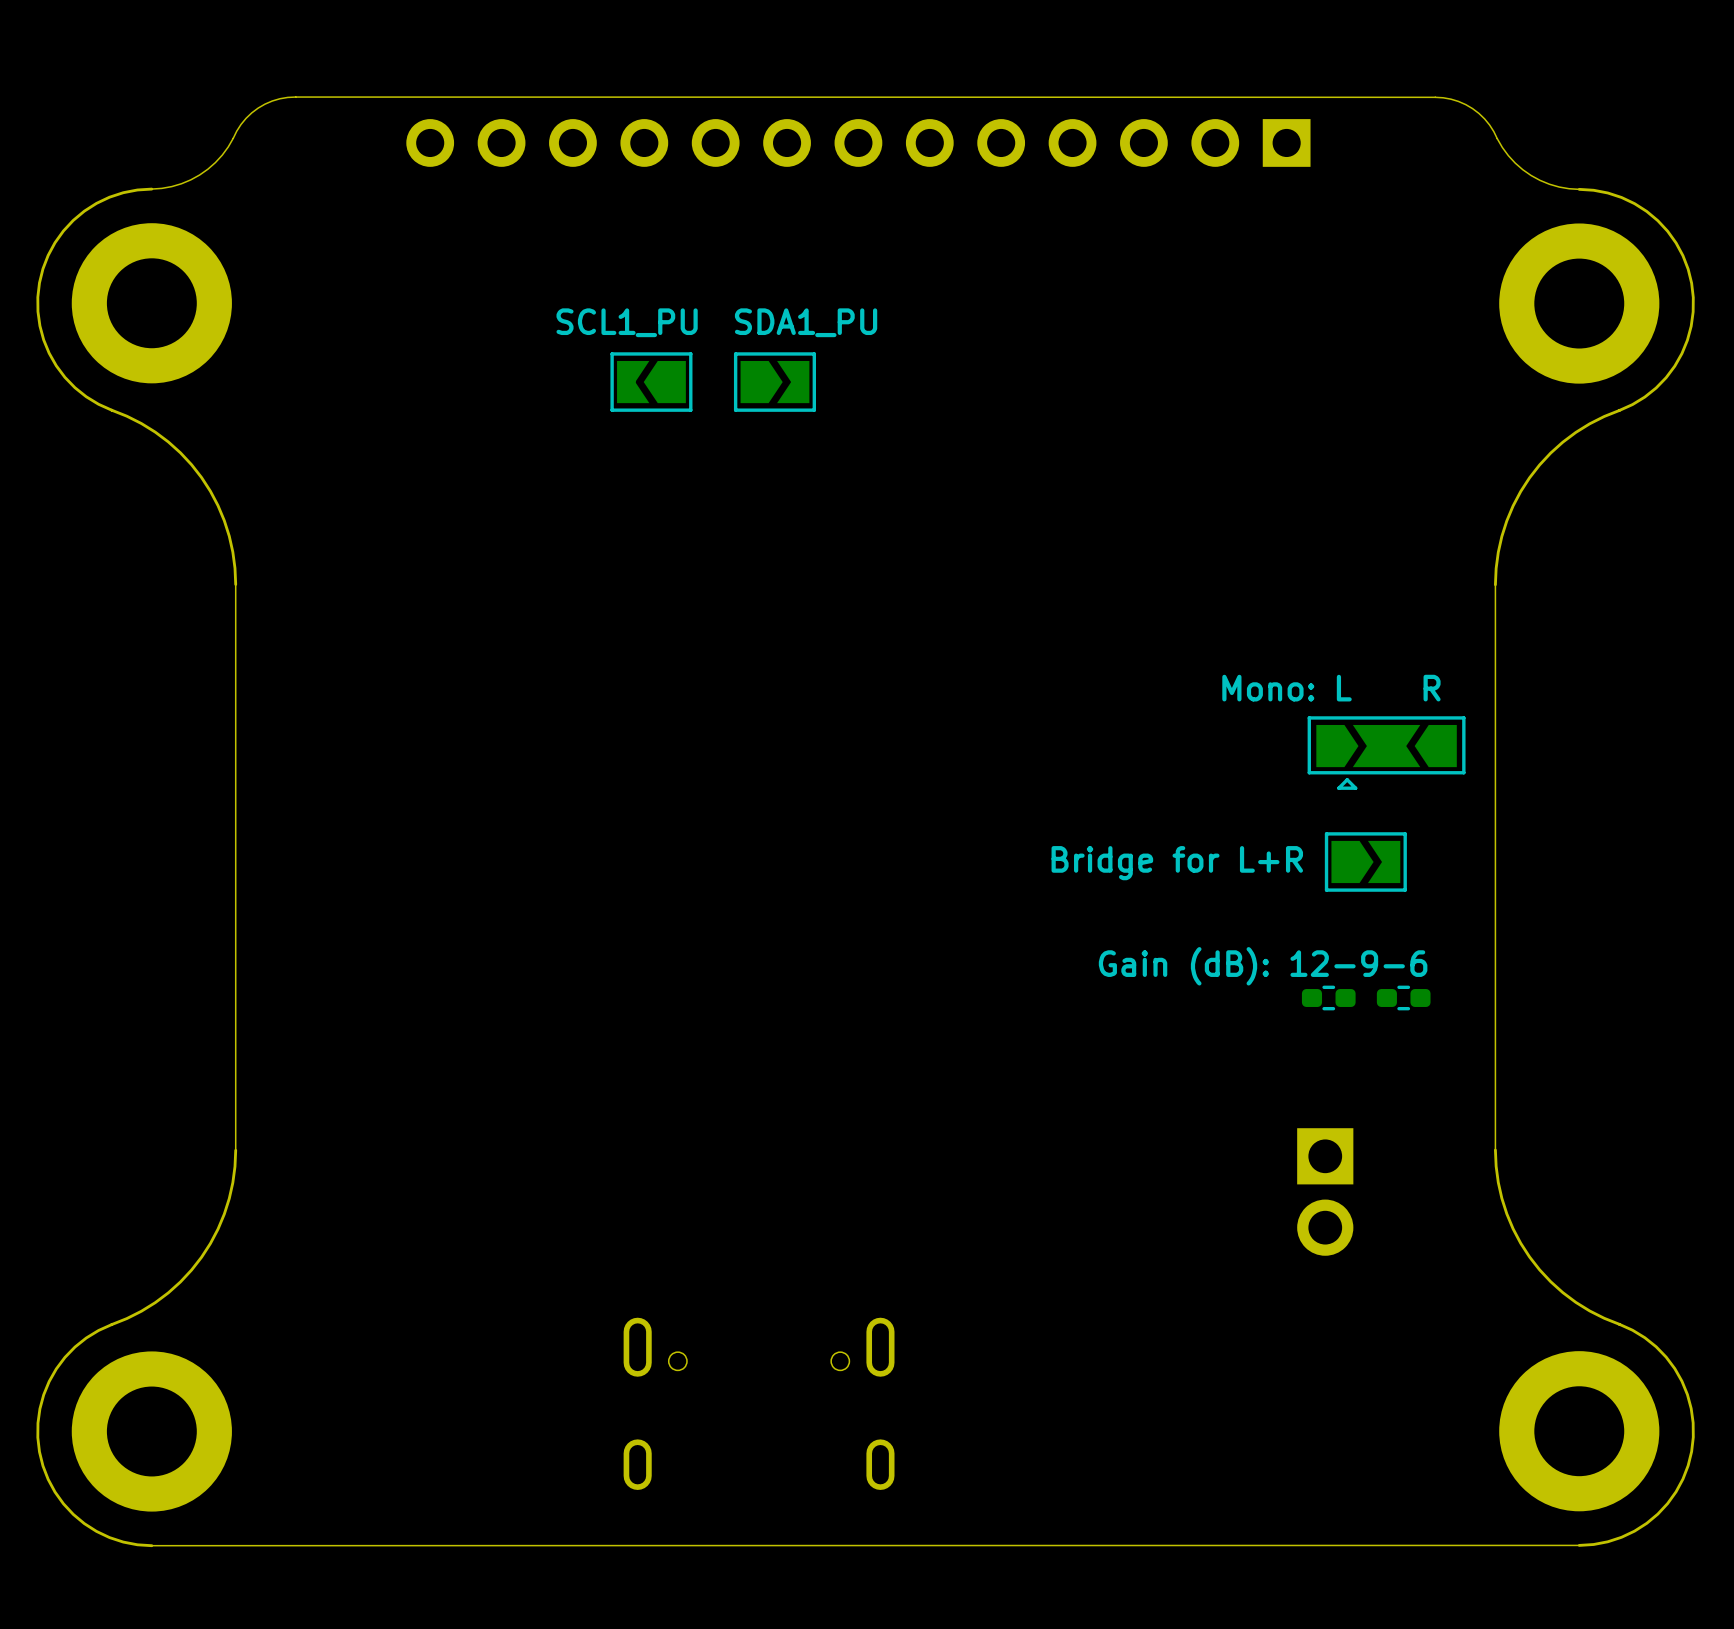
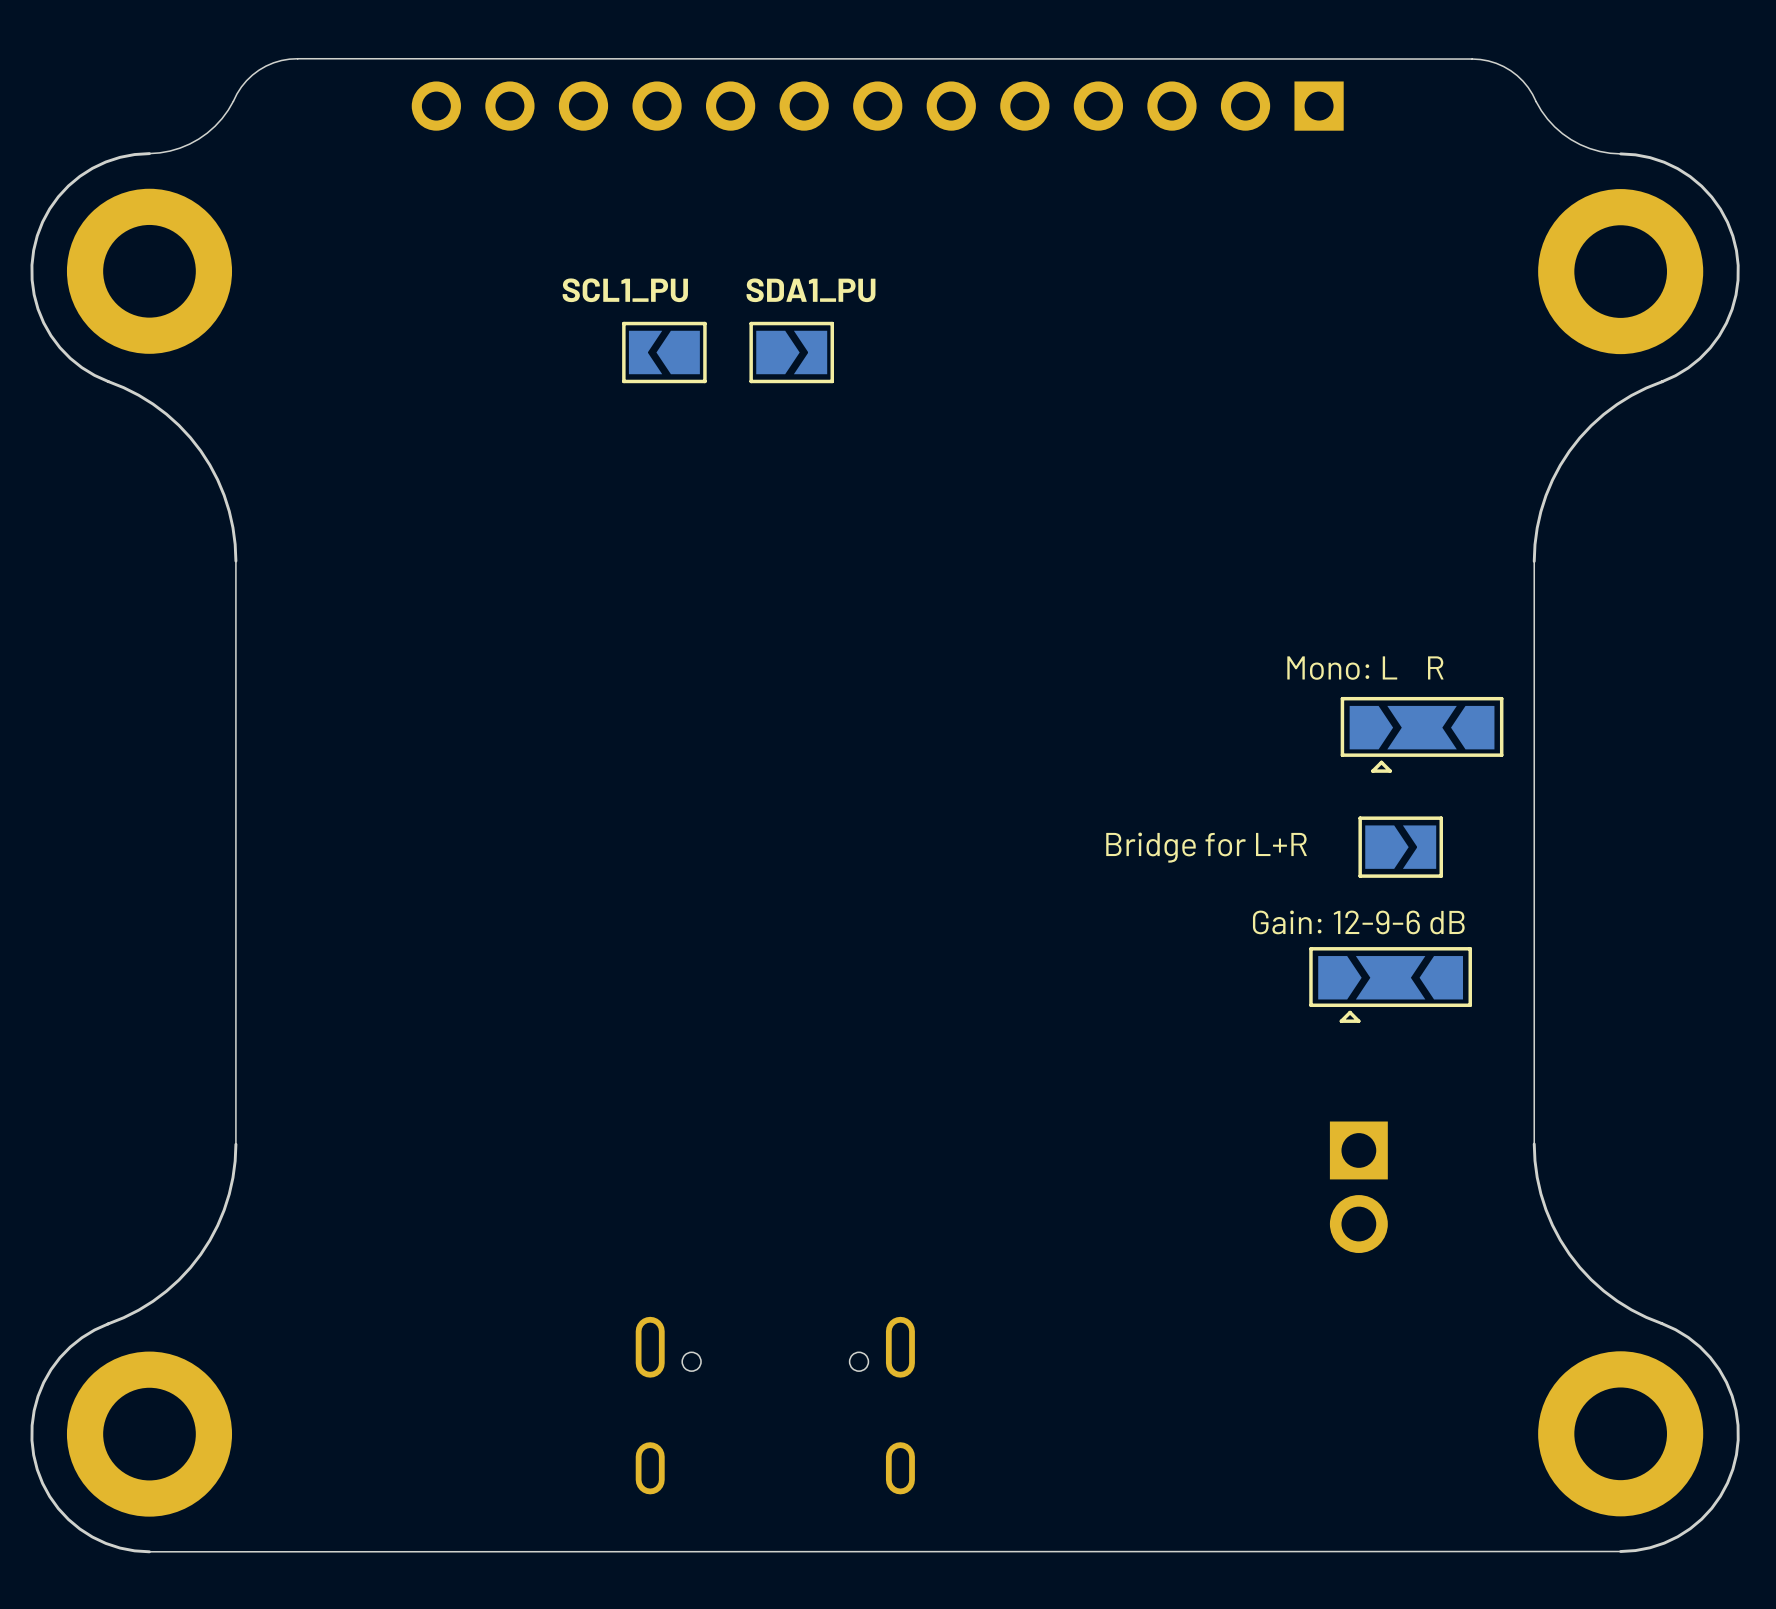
text: Gain (dB): 12-9-6 (1263, 966) -> Gain: 12-9-6 dB (1358, 922)
part: none -> (1390, 984)
part: (1328, 997) -> none
part: (1403, 997) -> none

